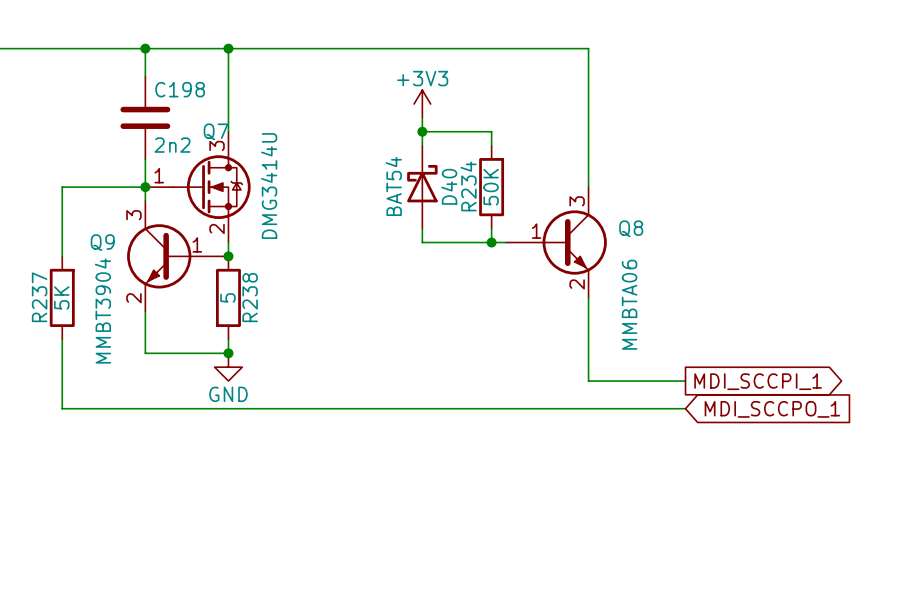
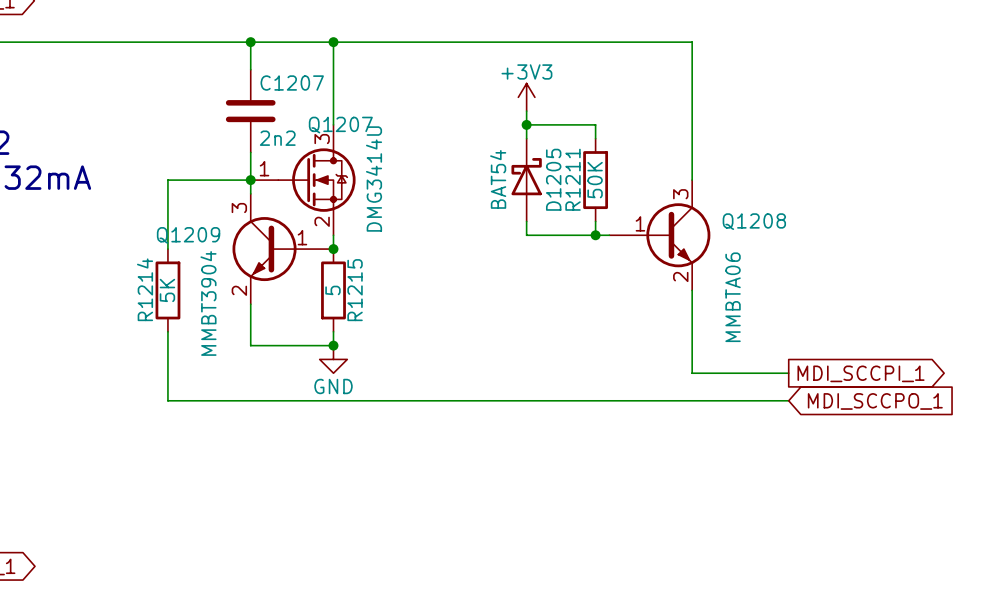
C198 name: C198 (180, 89) -> C1207 (292, 83)
Q7 name: Q7 (216, 131) -> Q1207 (340, 125)
D40 name: D40 (449, 186) -> D1205 (553, 179)
R234 name: R234 (468, 186) -> R1211 (573, 179)
Q8 name: Q8 (631, 228) -> Q1208 (754, 221)
Q9 name: Q9 (102, 242) -> Q1209 (188, 235)
R237 name: R237 (39, 297) -> R1214 (145, 289)
R238 name: R238 (250, 297) -> R1215 (355, 290)

